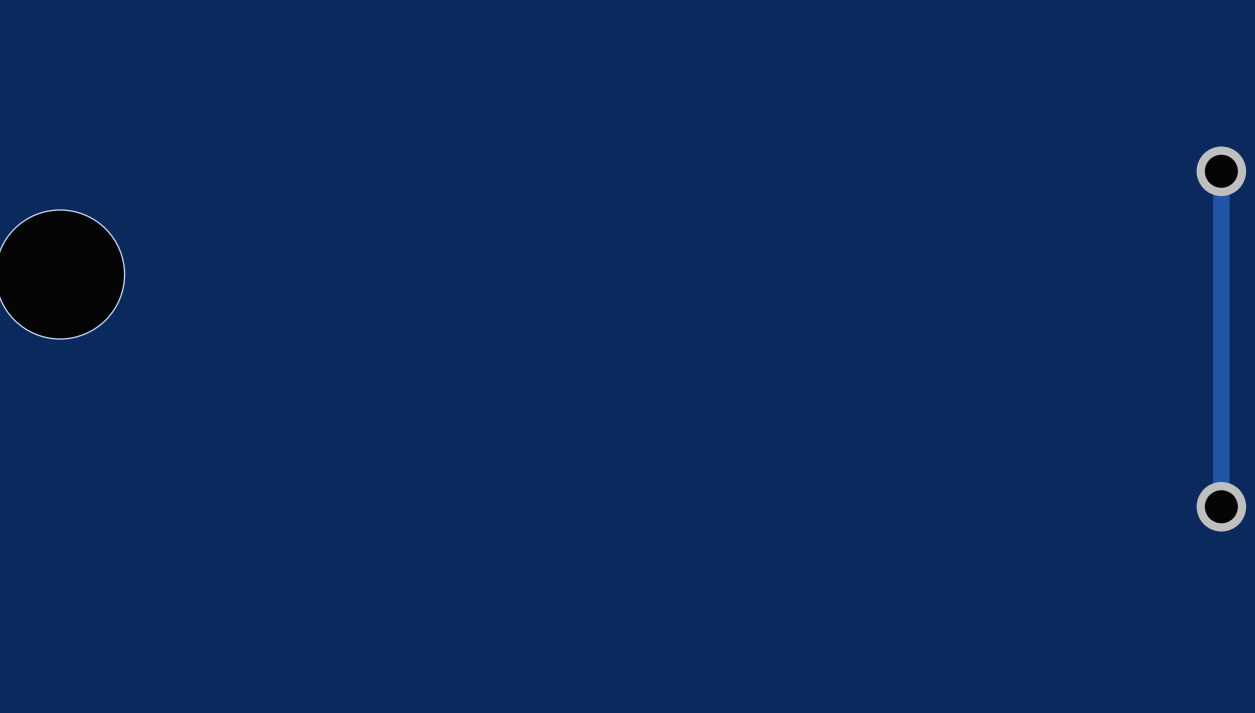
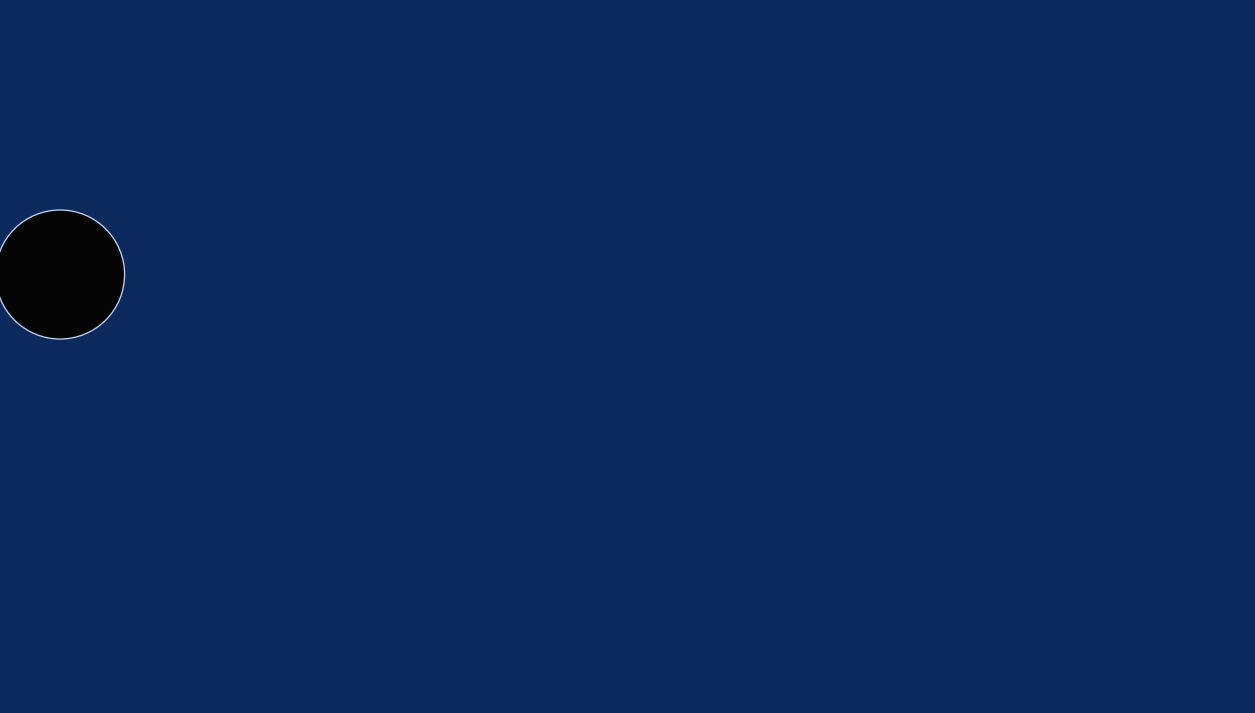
track: (1221, 171) (1221, 506) -> none
via: (1221, 171) -> none
via: (1221, 506) -> none

